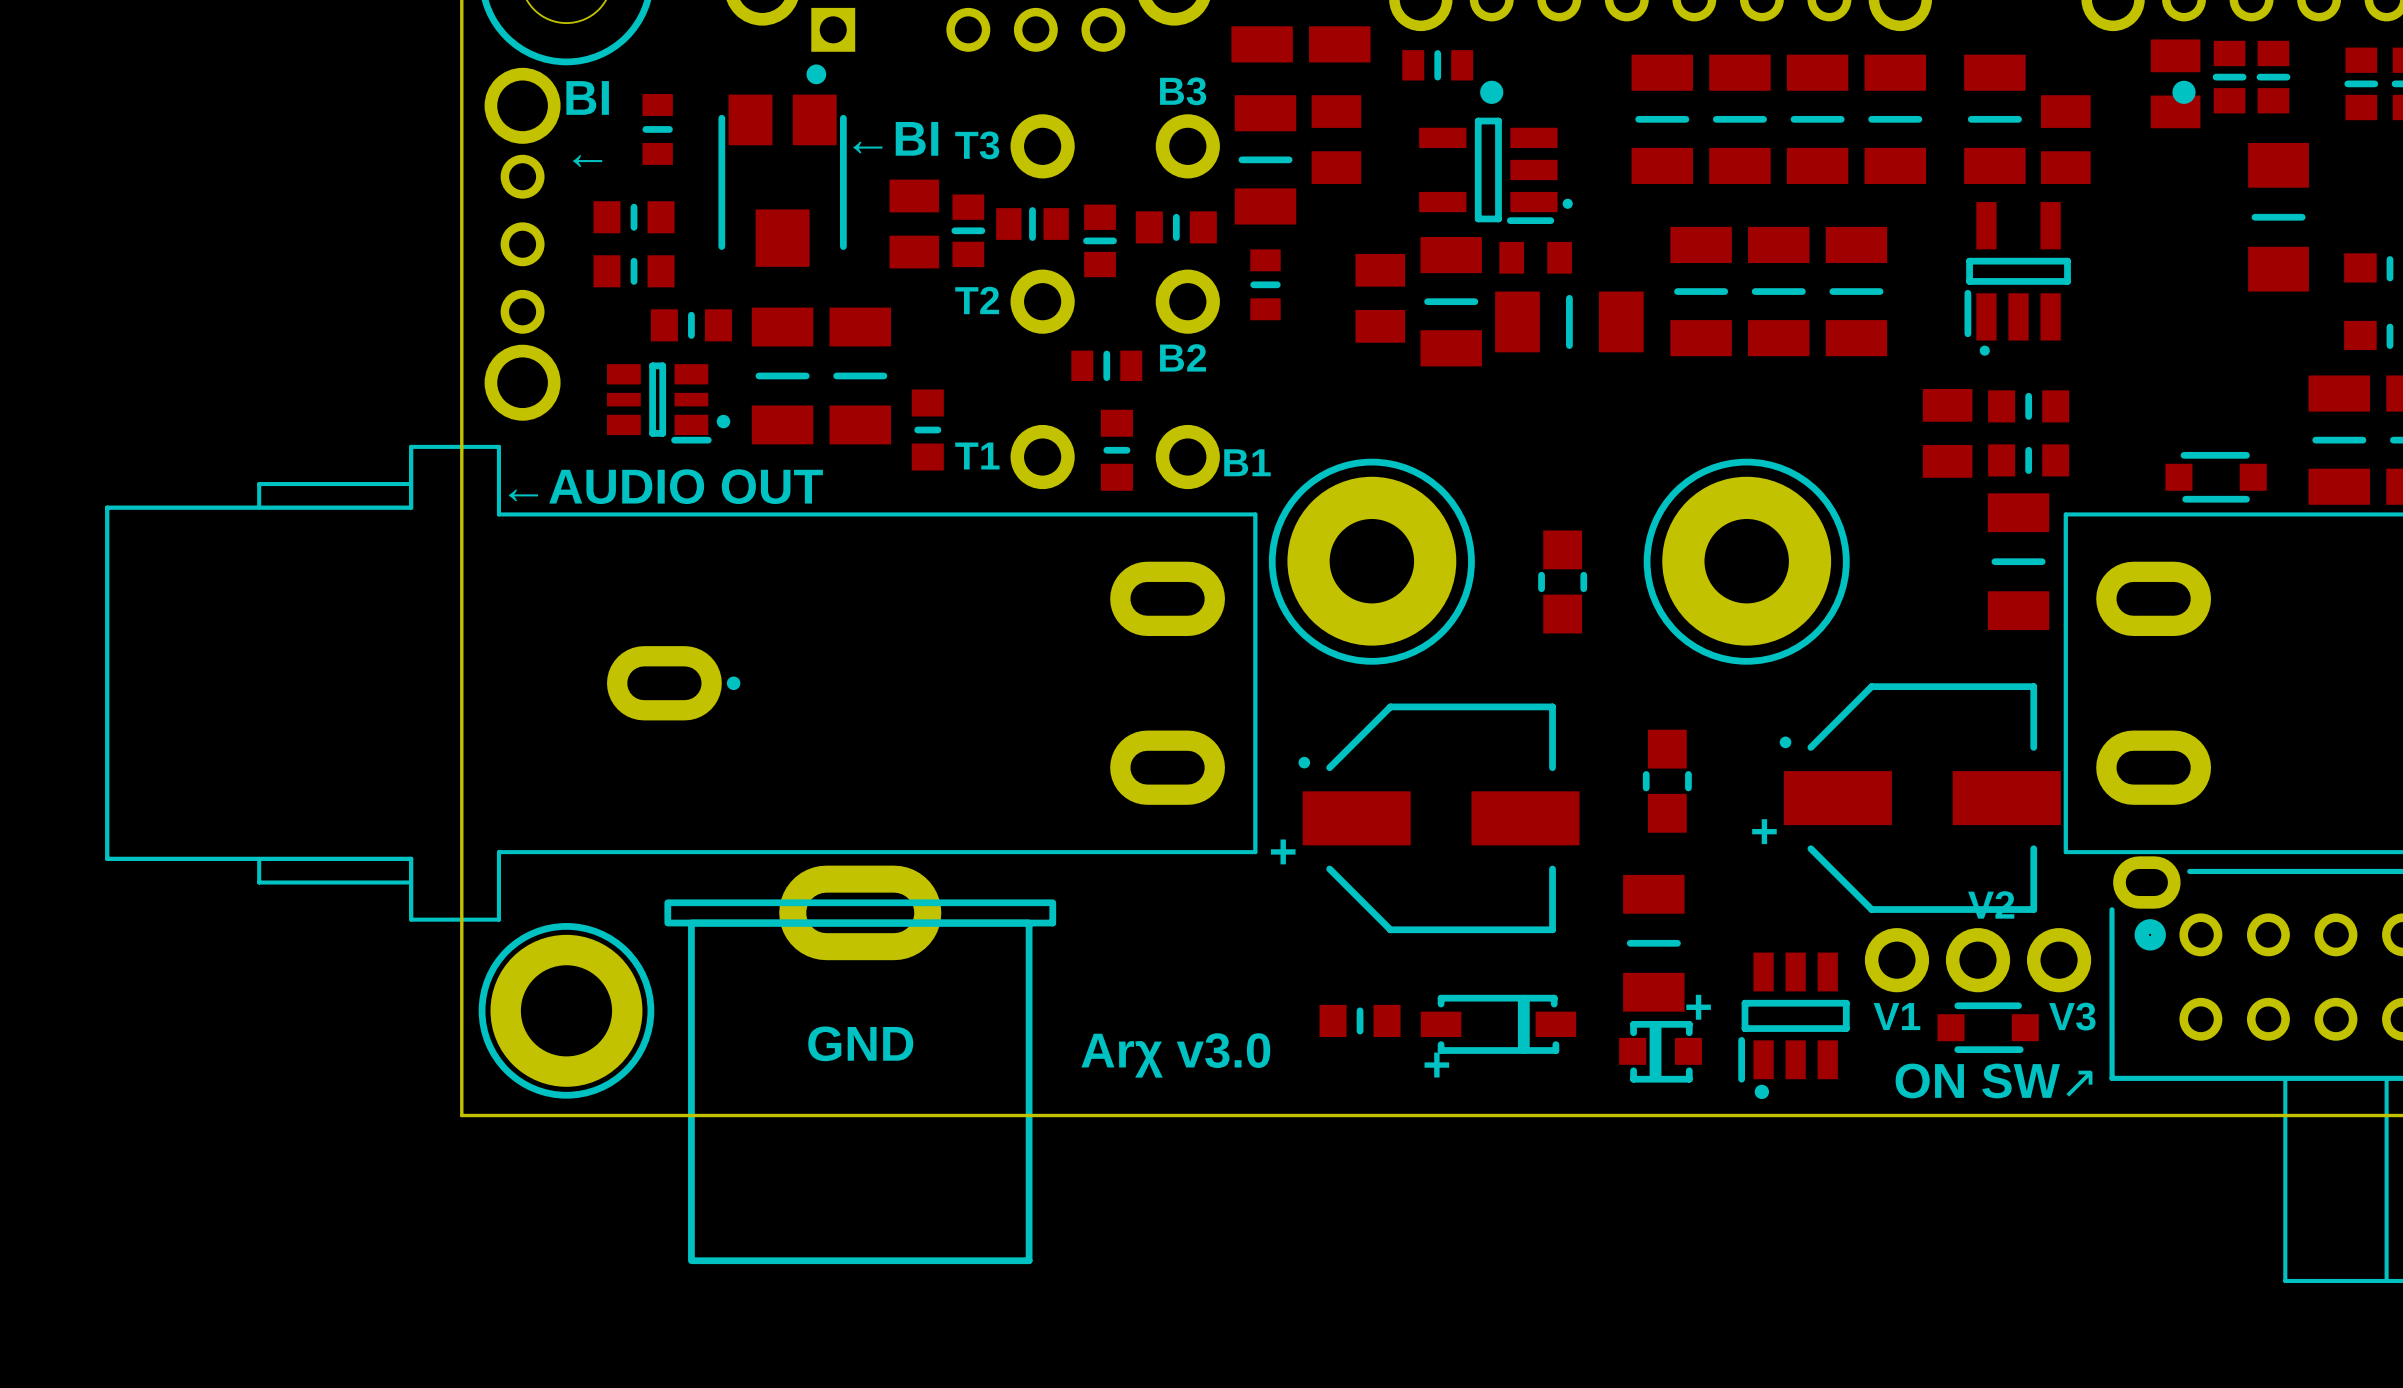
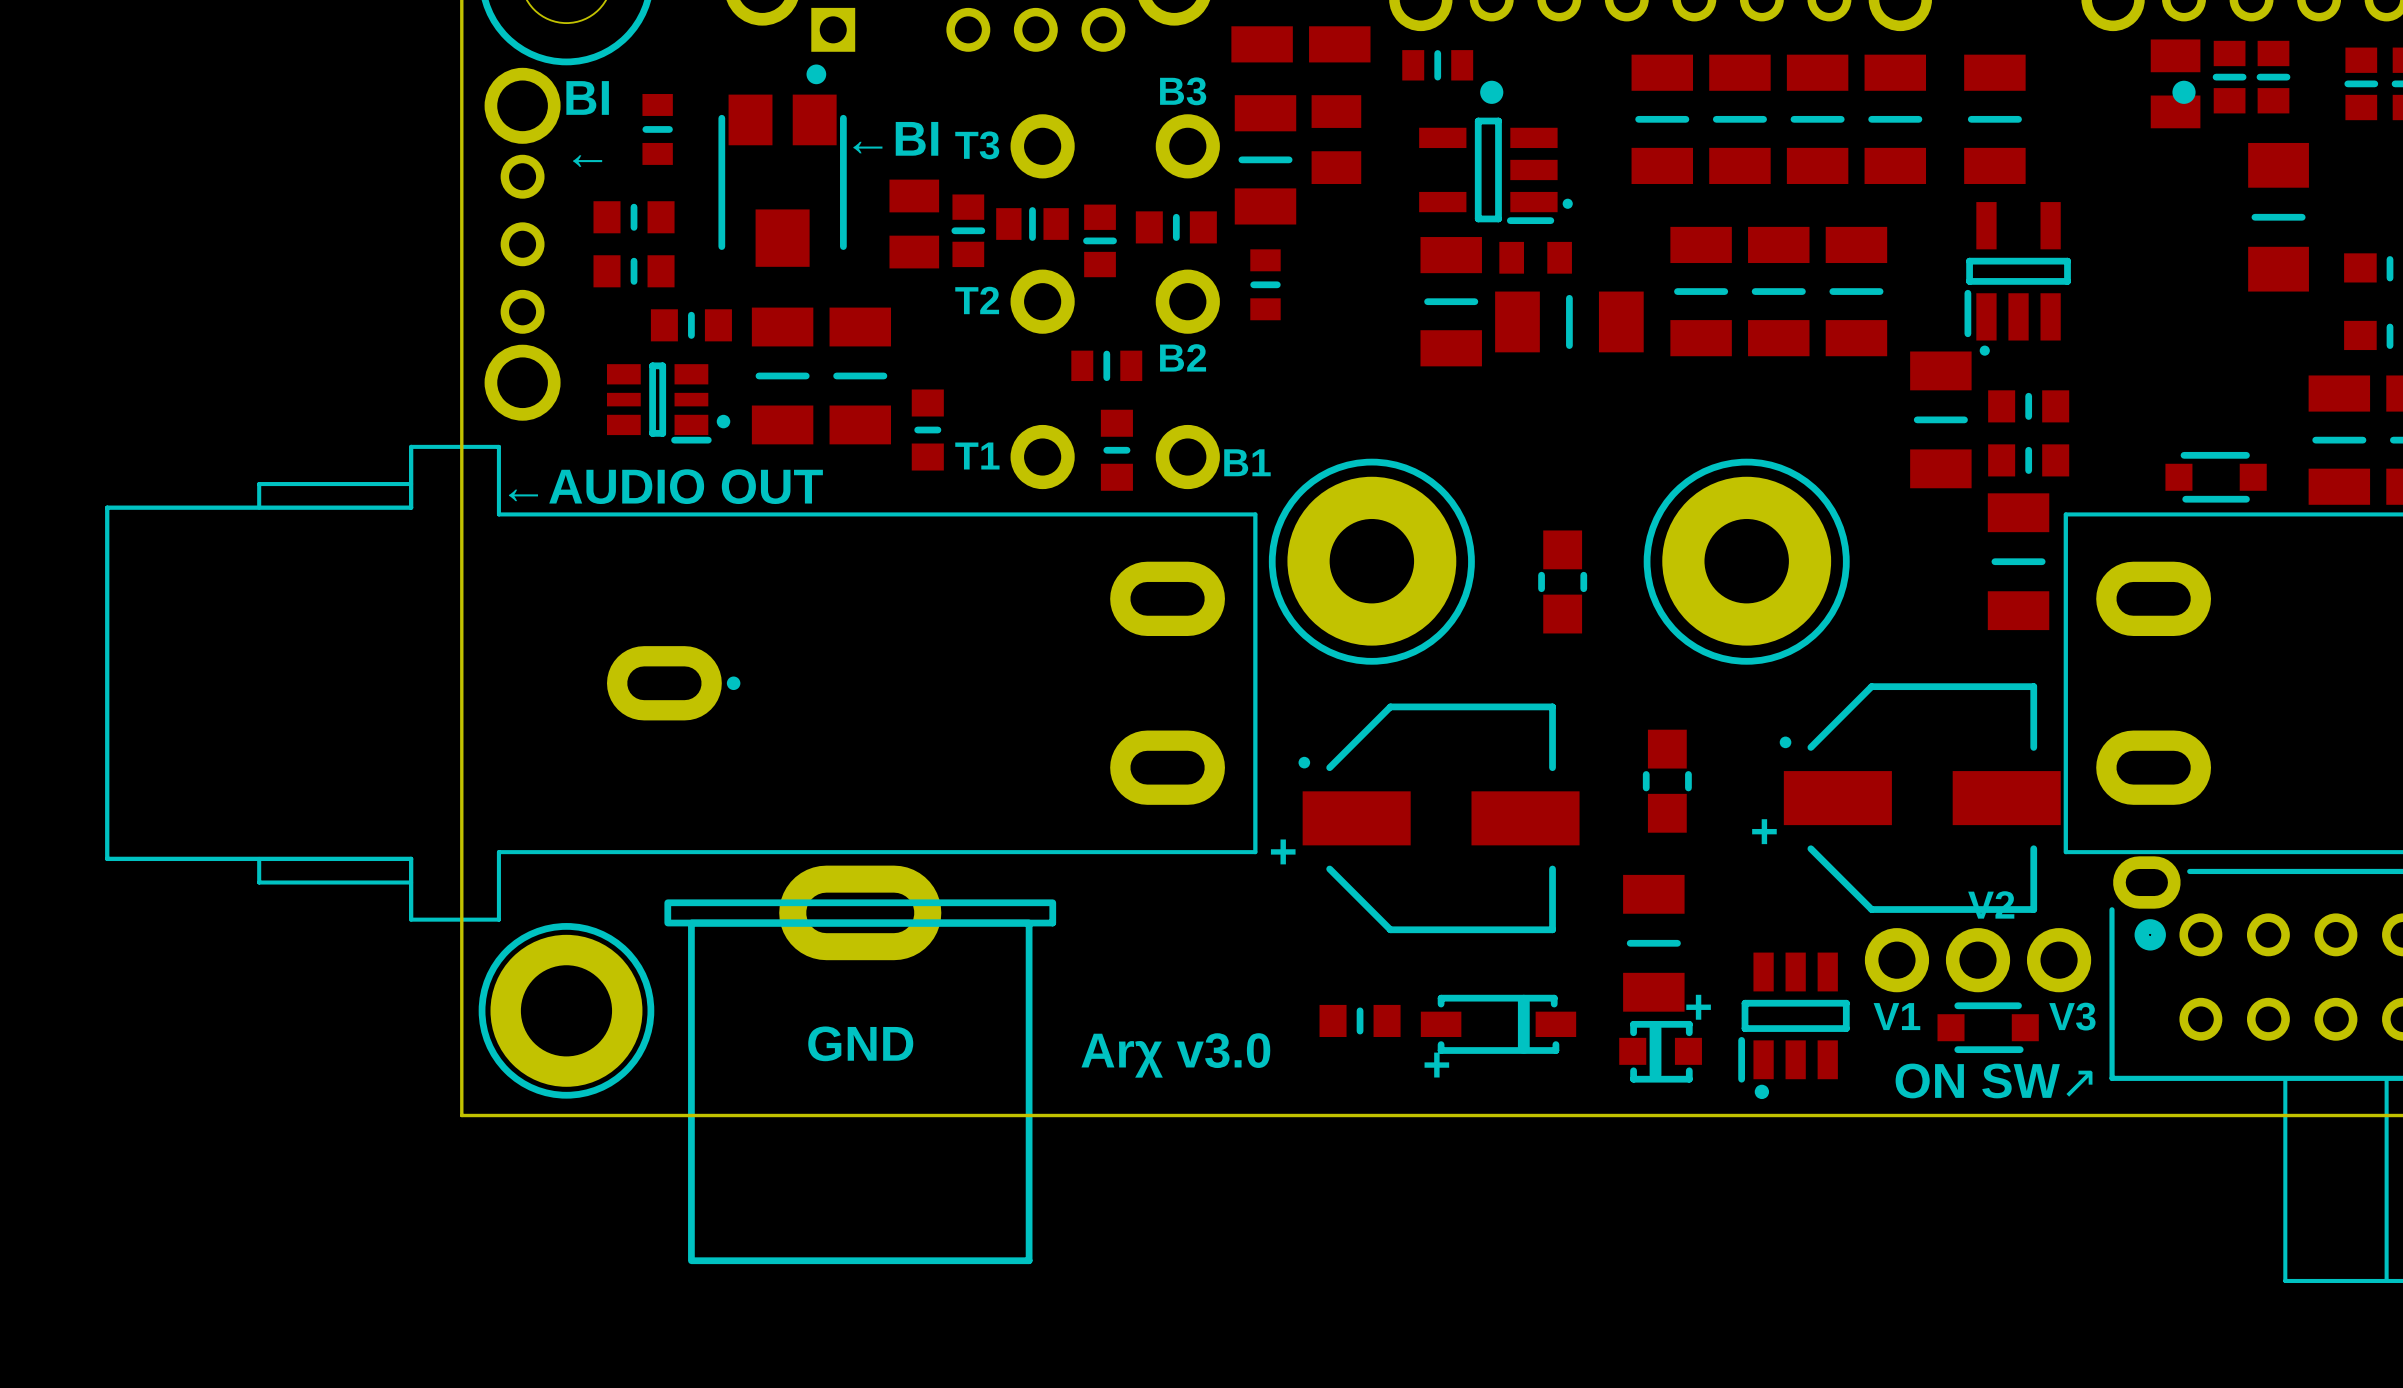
part: (2065, 139) -> none
part: (1380, 298) -> none
part footprint: [1922, 388, 1973, 478] -> [1910, 351, 1972, 489]

